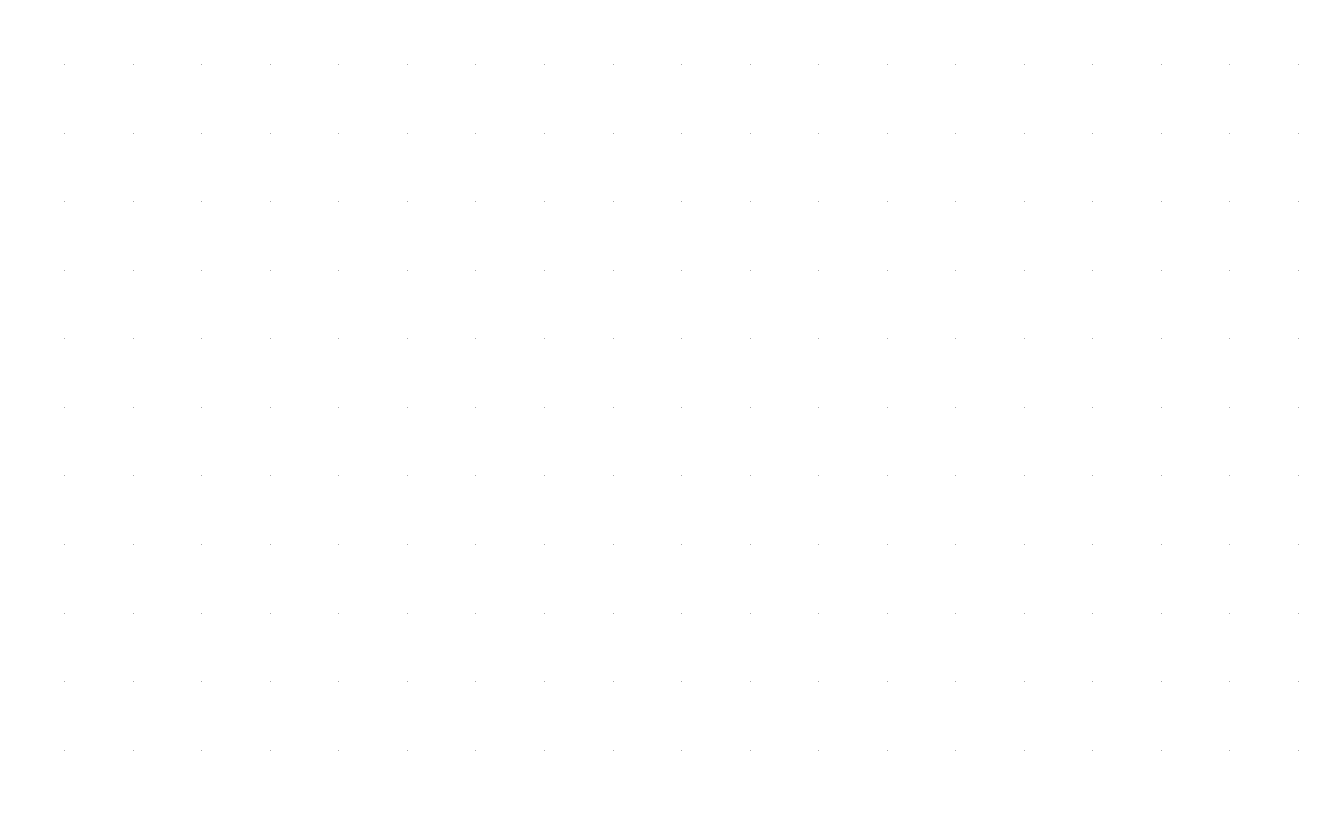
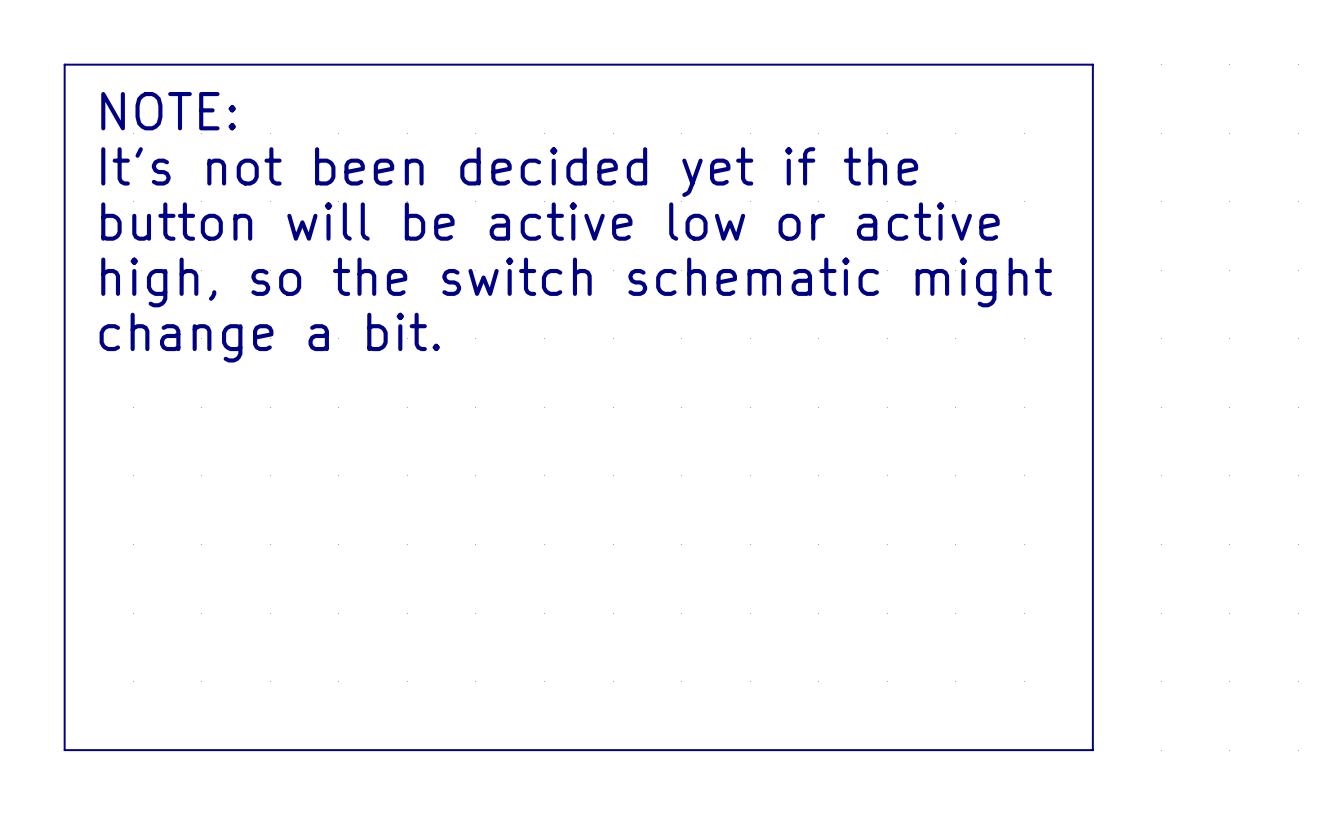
line: none -> (64, 64) (1092, 64) (1092, 750) (64, 750) (64, 64)
text: none -> NOTE: (168, 111)
text: none -> It's not been decided yet if the (509, 172)
text: none -> button will be active low or active (550, 221)
text: none -> high, so the switch schematic might (576, 282)
text: none -> change a bit. (269, 337)

